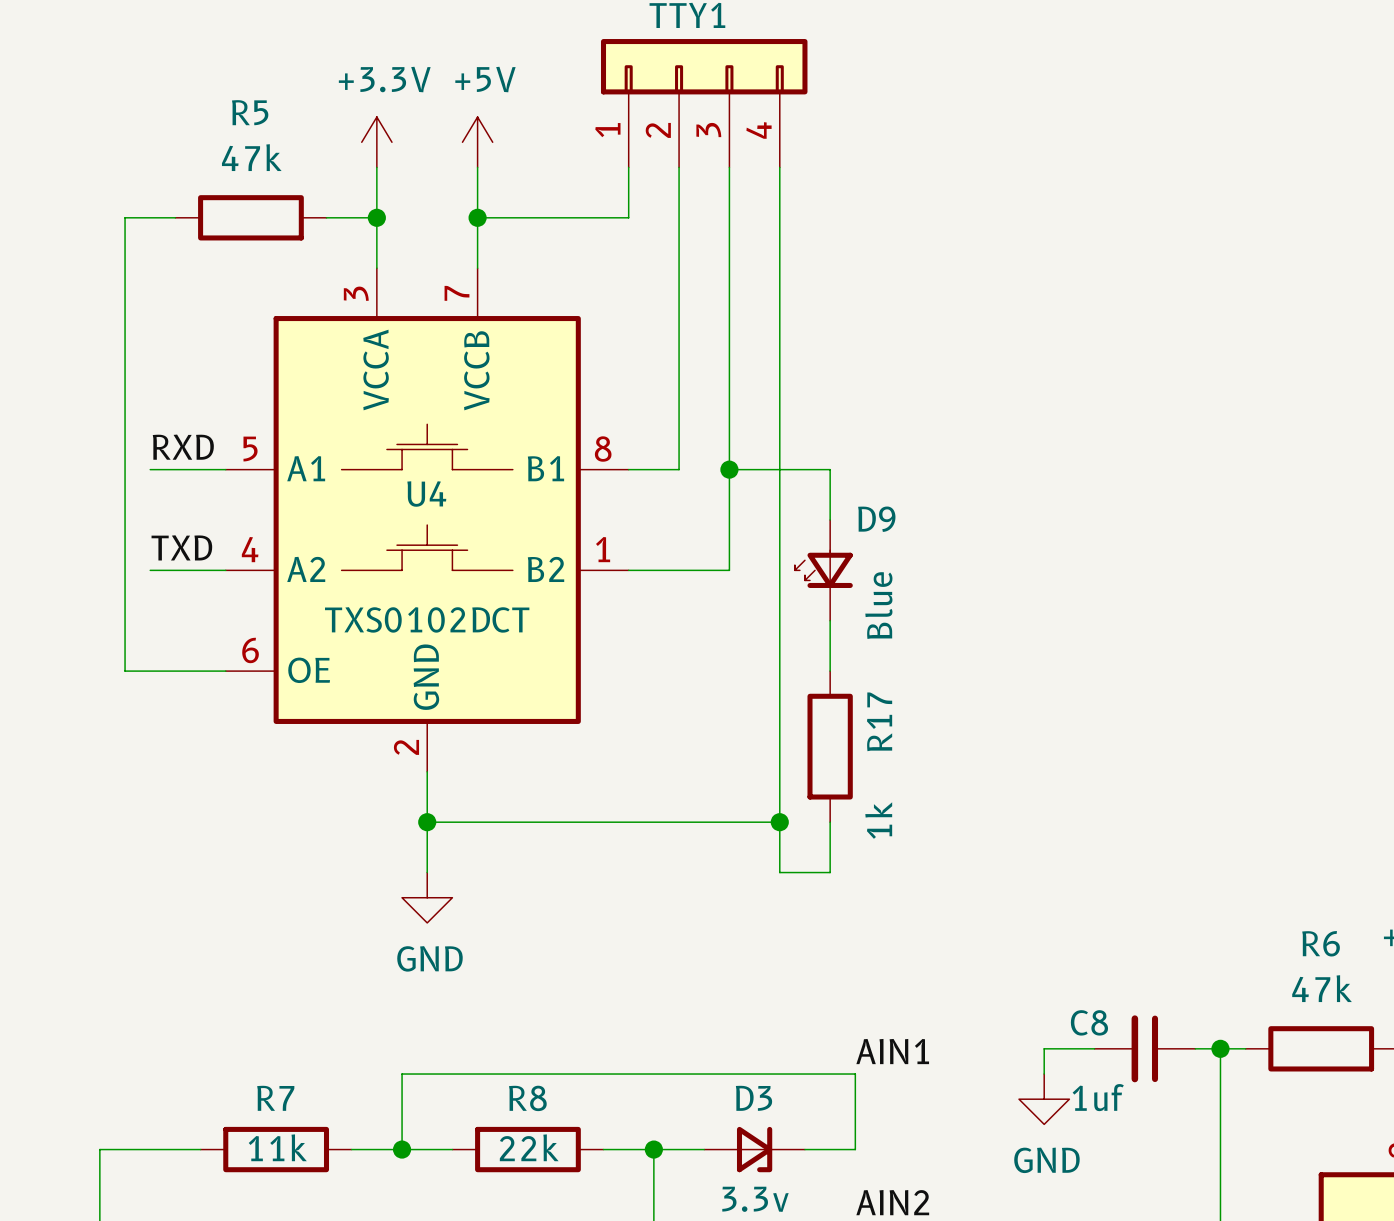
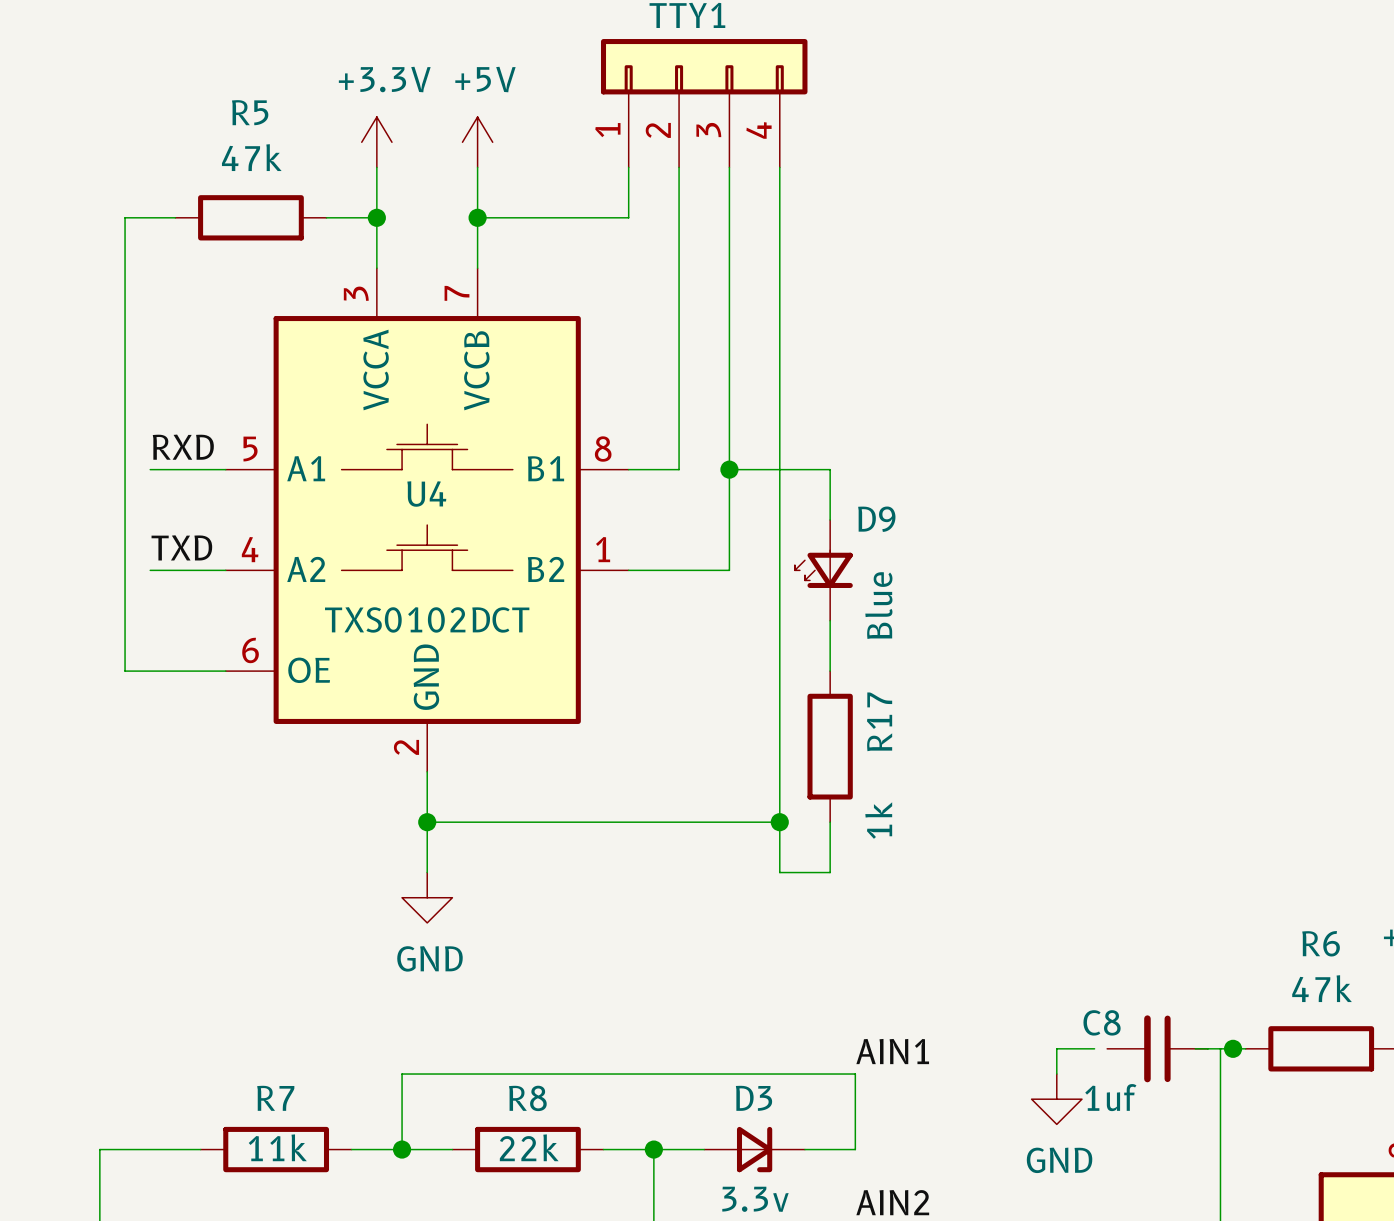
wire: (1056, 1048) (1044, 1048) (1044, 1074) -> (1056, 1048) (1056, 1074)
C8 position: (1144, 1048) -> (1157, 1048)
junction position: (1220, 1048) -> (1233, 1048)
power symbol position: GND (1044, 1099) -> GND (1056, 1099)

